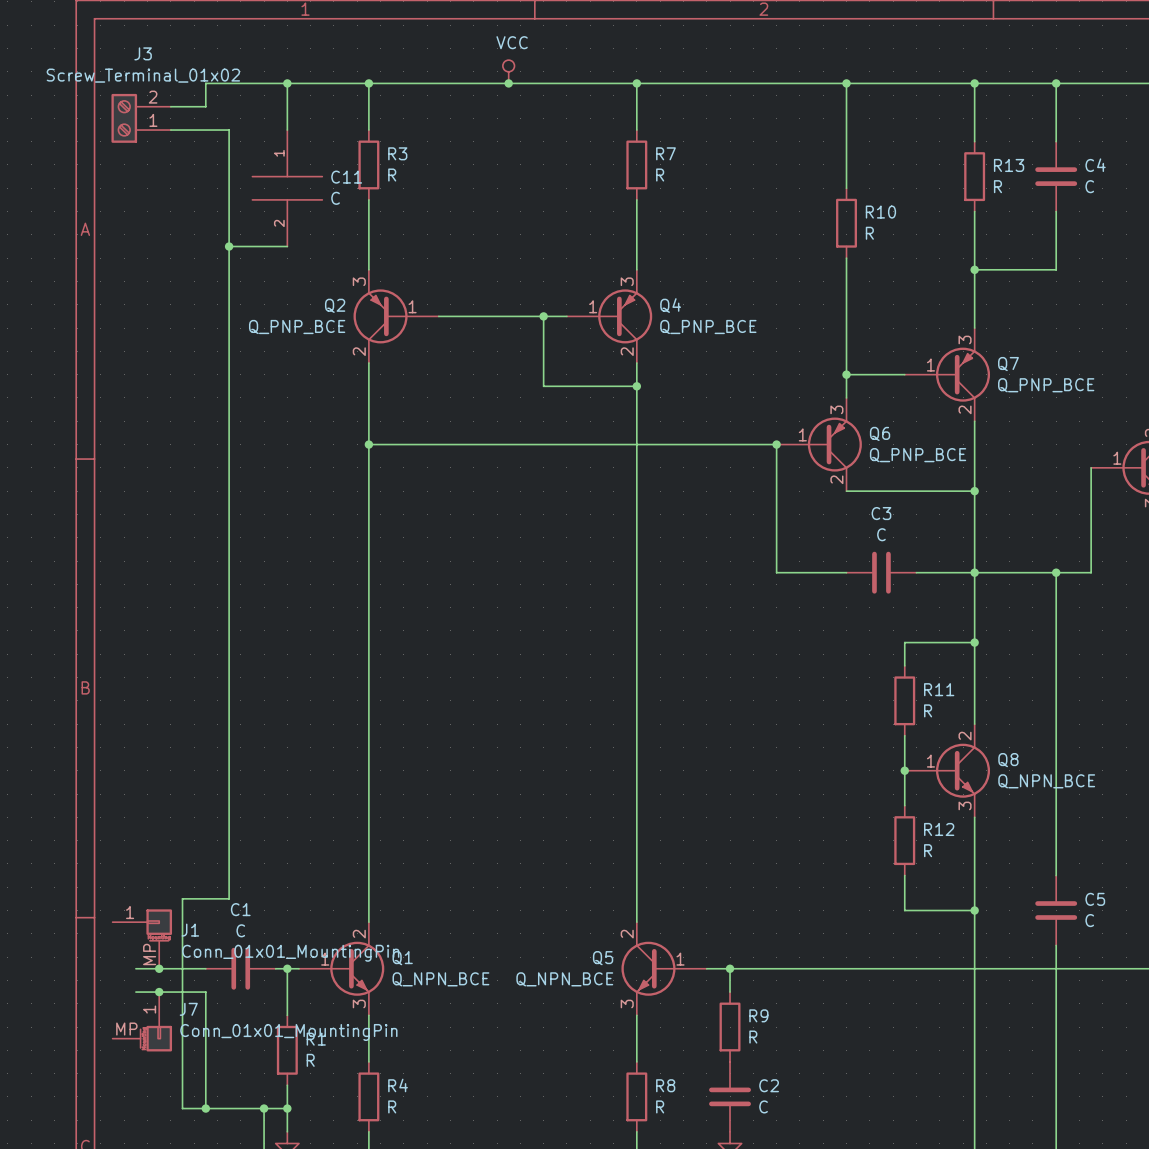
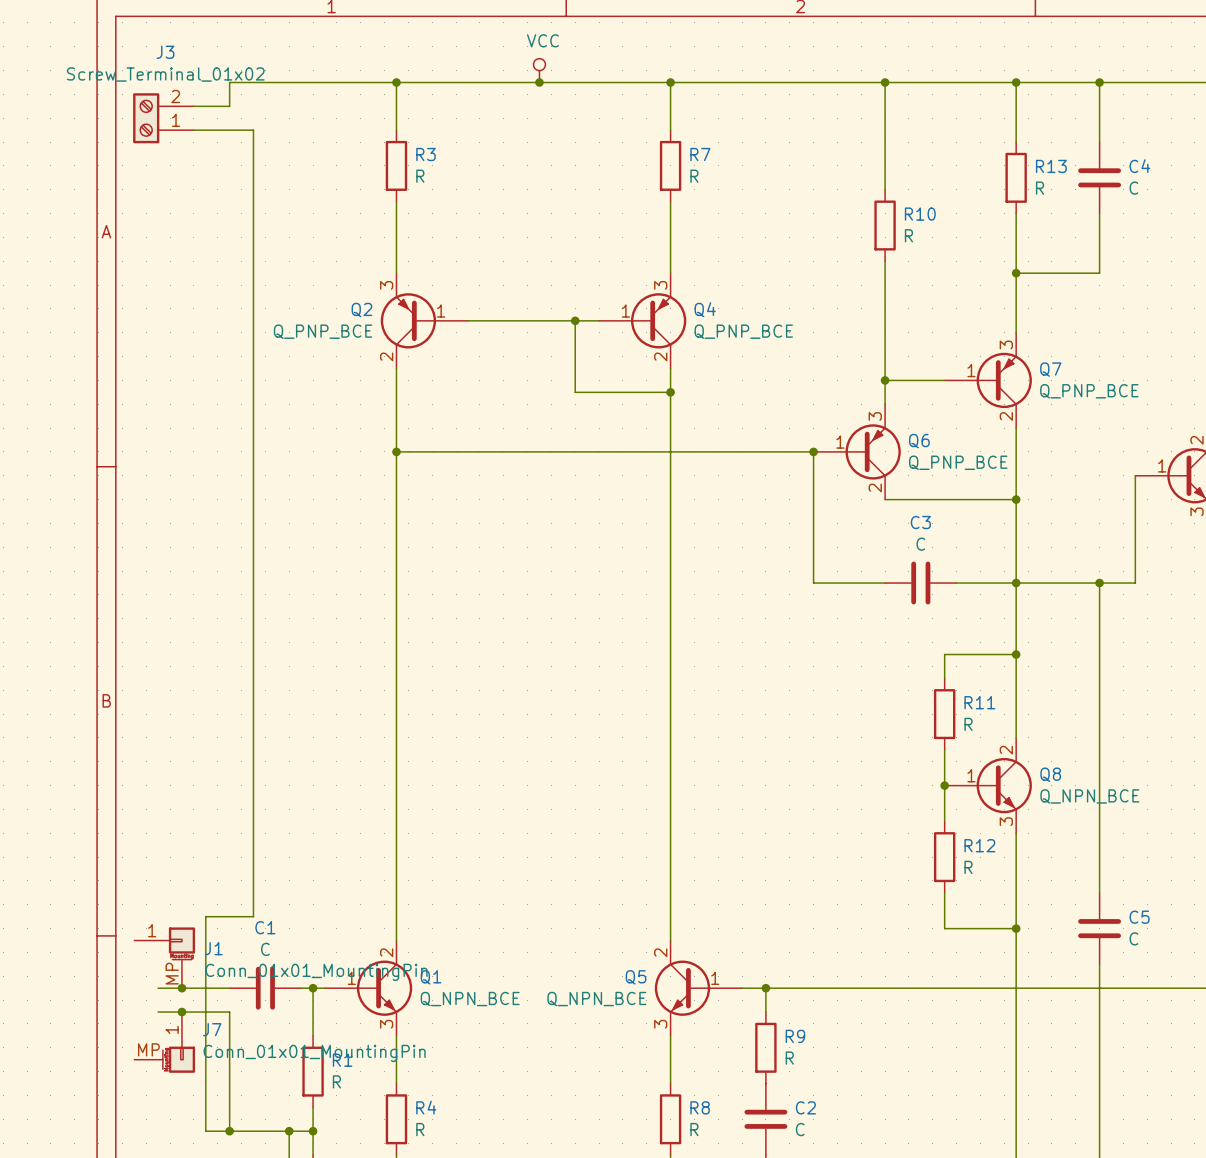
wire: (287, 83) (287, 130) -> none
junction: (287, 83) -> none
C11: C (287, 188) -> none
wire: (229, 246) (287, 246) -> none
junction: (229, 246) -> none

